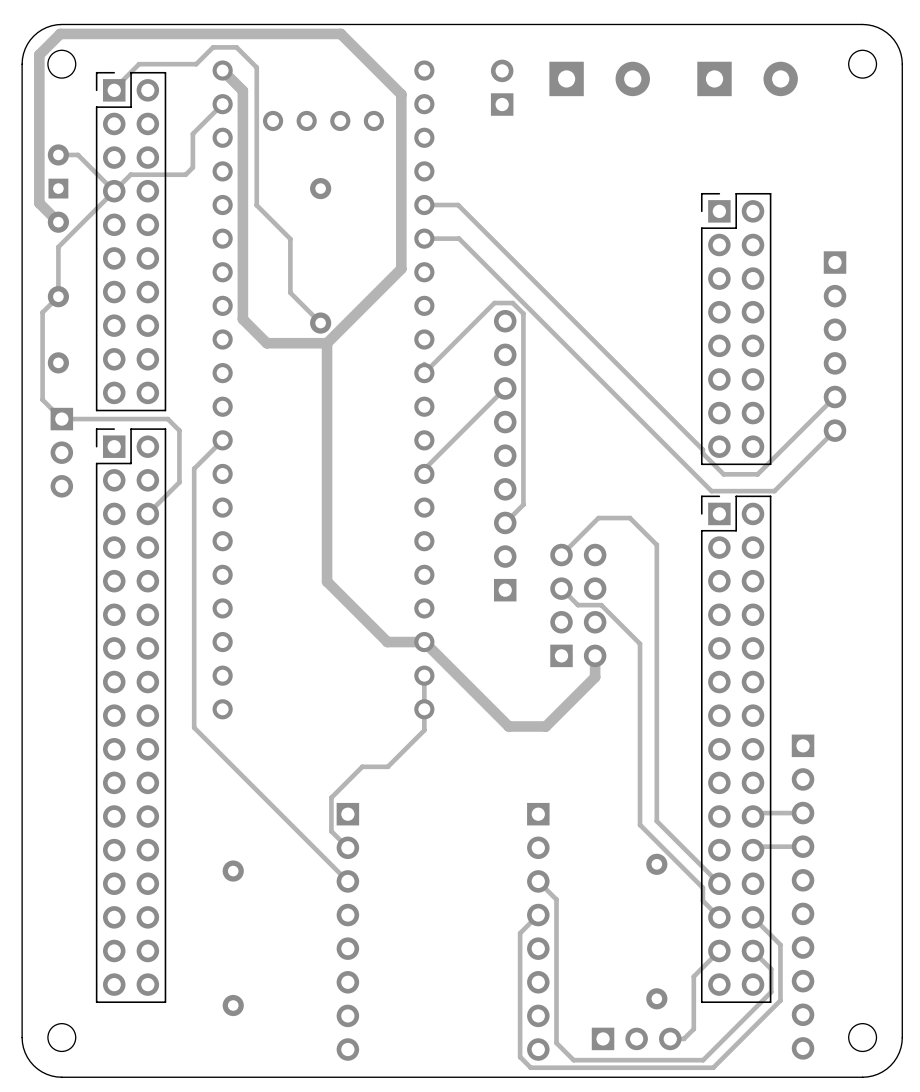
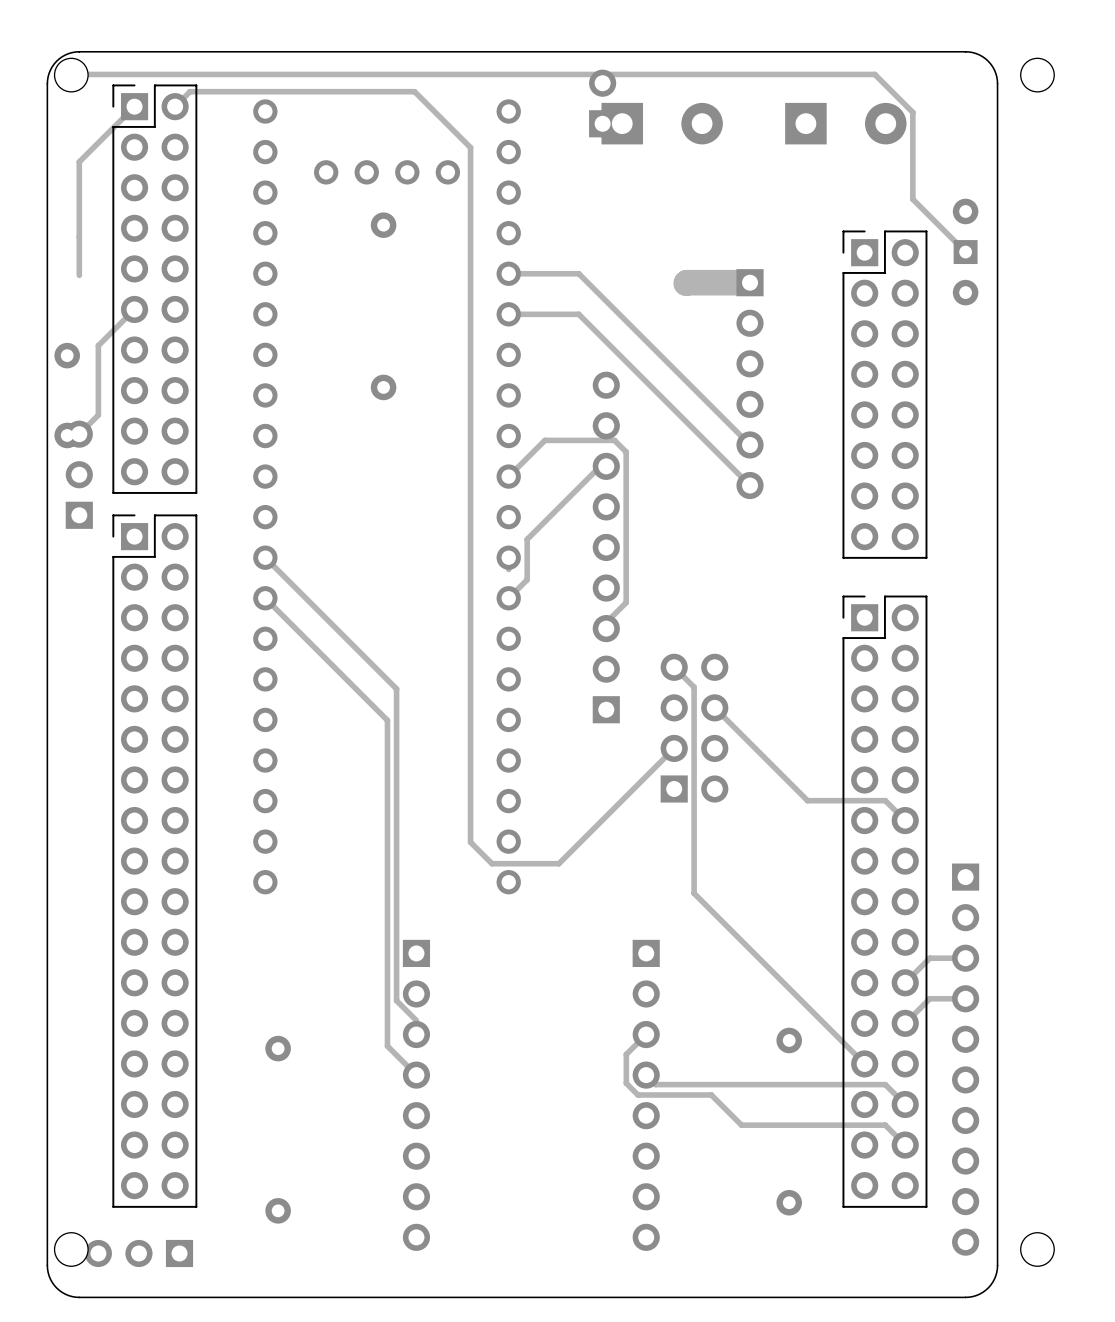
track: none -> (79, 74) (874, 74) (912, 112) (912, 199) (965, 252)
track: (222, 70) (242, 90) (242, 319) (266, 343) (327, 343) -> none
part: (599, 78) -> none
part position: (747, 78) -> (845, 123)
track: (114, 89) (139, 64) (196, 64) (213, 47) (236, 47) (256, 67) (256, 205) (290, 239) (290, 292) (320, 323) -> none
track: none -> (134, 106) (79, 161) (79, 275)
track: none -> (175, 106) (190, 91) (414, 91) (470, 147) (470, 842) (492, 863) (558, 863) (674, 748)
track: (222, 104) (192, 133) (192, 167) (185, 174) (130, 174) (58, 247) (58, 296) (42, 312) (42, 399) (61, 419) (167, 419) (179, 430) (179, 482) (147, 513) -> none
part: none -> (662, 123)
track: (58, 154) (78, 154) (114, 191) -> none
part: (58, 188) -> none
track: (424, 205) (458, 205) (702, 449) (702, 453) (723, 474) (757, 474) (835, 397) -> none
part: none -> (965, 252)
track: (58, 222) (39, 203) (39, 54) (60, 33) (340, 33) (401, 94) (401, 268) (327, 343) -> none
track: none -> (508, 273) (578, 273) (750, 444)
track: none -> (750, 282) (686, 283)
track: (424, 238) (459, 238) (711, 491) (774, 491) (835, 430) -> none
track: none -> (134, 309) (98, 345) (98, 415) (79, 434)
track: none -> (508, 314) (578, 314) (750, 485)
track: (327, 343) (327, 581) (387, 642) (424, 642) (508, 726) (545, 726) (595, 677) (595, 655) -> none
part position: (835, 346) -> (750, 384)
track: (424, 363) (424, 373) (494, 303) (512, 303) (523, 313) (523, 504) (505, 522) -> none
track: none -> (606, 460) (527, 539) (527, 579) (508, 598)
track: (505, 388) (424, 469) -> none
part position: (323, 389) -> (387, 496)
track: none -> (508, 476) (544, 440) (614, 440) (626, 452) (626, 602) (606, 622)
track: (222, 440) (194, 468) (194, 727) (347, 881) -> none
part rotation: 0° (61, 452) -> 180° (79, 474)
part position: (61, 452) -> (79, 474)
track: none -> (265, 598) (387, 720) (387, 1046) (416, 1075)
track: (561, 555) (598, 518) (629, 518) (656, 544) (656, 821) -> (674, 667) (694, 687) (694, 893) (789, 988)
track: (561, 588) (577, 605) (601, 605) (640, 643) (640, 824) (702, 887) (702, 900) (719, 917) -> none
track: none -> (714, 707) (807, 800) (885, 800) (905, 820)
track: (424, 675) (424, 730) (387, 766) (362, 766) (331, 797) -> (265, 557) (396, 688) (396, 960)
track: (803, 813) (756, 813) -> (965, 958) (929, 958) (909, 978)
track: (803, 846) (756, 846) -> (965, 998) (929, 998) (909, 1019)
track: (538, 881) (556, 899) (556, 1043) (573, 1060) (703, 1060) (771, 992) (771, 969) (753, 950) -> (646, 1034) (626, 1054) (626, 1083) (637, 1094) (711, 1094) (741, 1125) (885, 1125) (905, 1145)
part position: (803, 897) -> (965, 1059)
track: (538, 915) (520, 933) (520, 1057) (530, 1067) (713, 1067) (780, 1000) (780, 944) (753, 917) -> (646, 1075) (655, 1084) (885, 1084) (905, 1104)
part position: (347, 931) -> (416, 1095)
part position: (538, 931) -> (646, 1095)
track: (719, 950) (693, 976) (693, 1029) (683, 1038) (670, 1038) -> none
part: (636, 1038) -> none
part: none -> (138, 1253)
board edge: (803, 1077) (862, 1077) (877, 1074) (890, 1065) (896, 1057) (902, 1037) (902, 64) (899, 48) (890, 36) (877, 27) (862, 24) (61, 24) (41, 29) (30, 40) (25, 48) (22, 64) (22, 1037) (27, 1057) (37, 1069) (51, 1075) (68, 1077) -> (965, 1297) (976, 1295) (988, 1288) (995, 1276) (997, 1265) (997, 83) (995, 73) (988, 61) (976, 53) (965, 51) (79, 51) (65, 54) (54, 63) (49, 73) (47, 83) (47, 1265) (49, 1276) (56, 1288) (68, 1295) (79, 1297)

